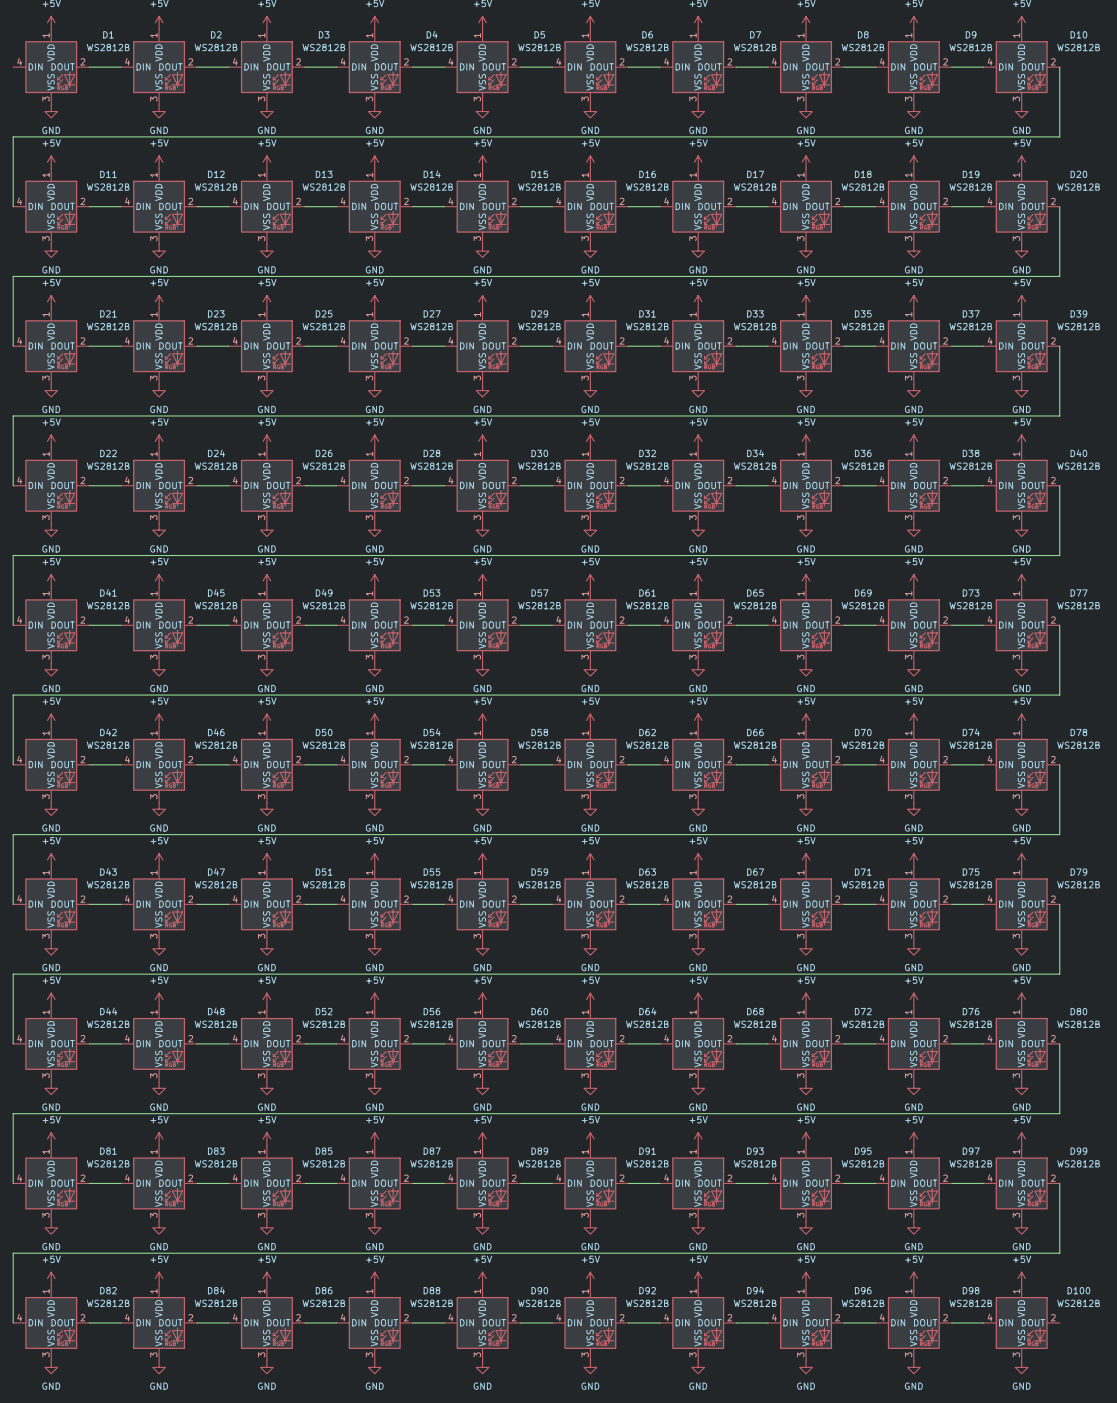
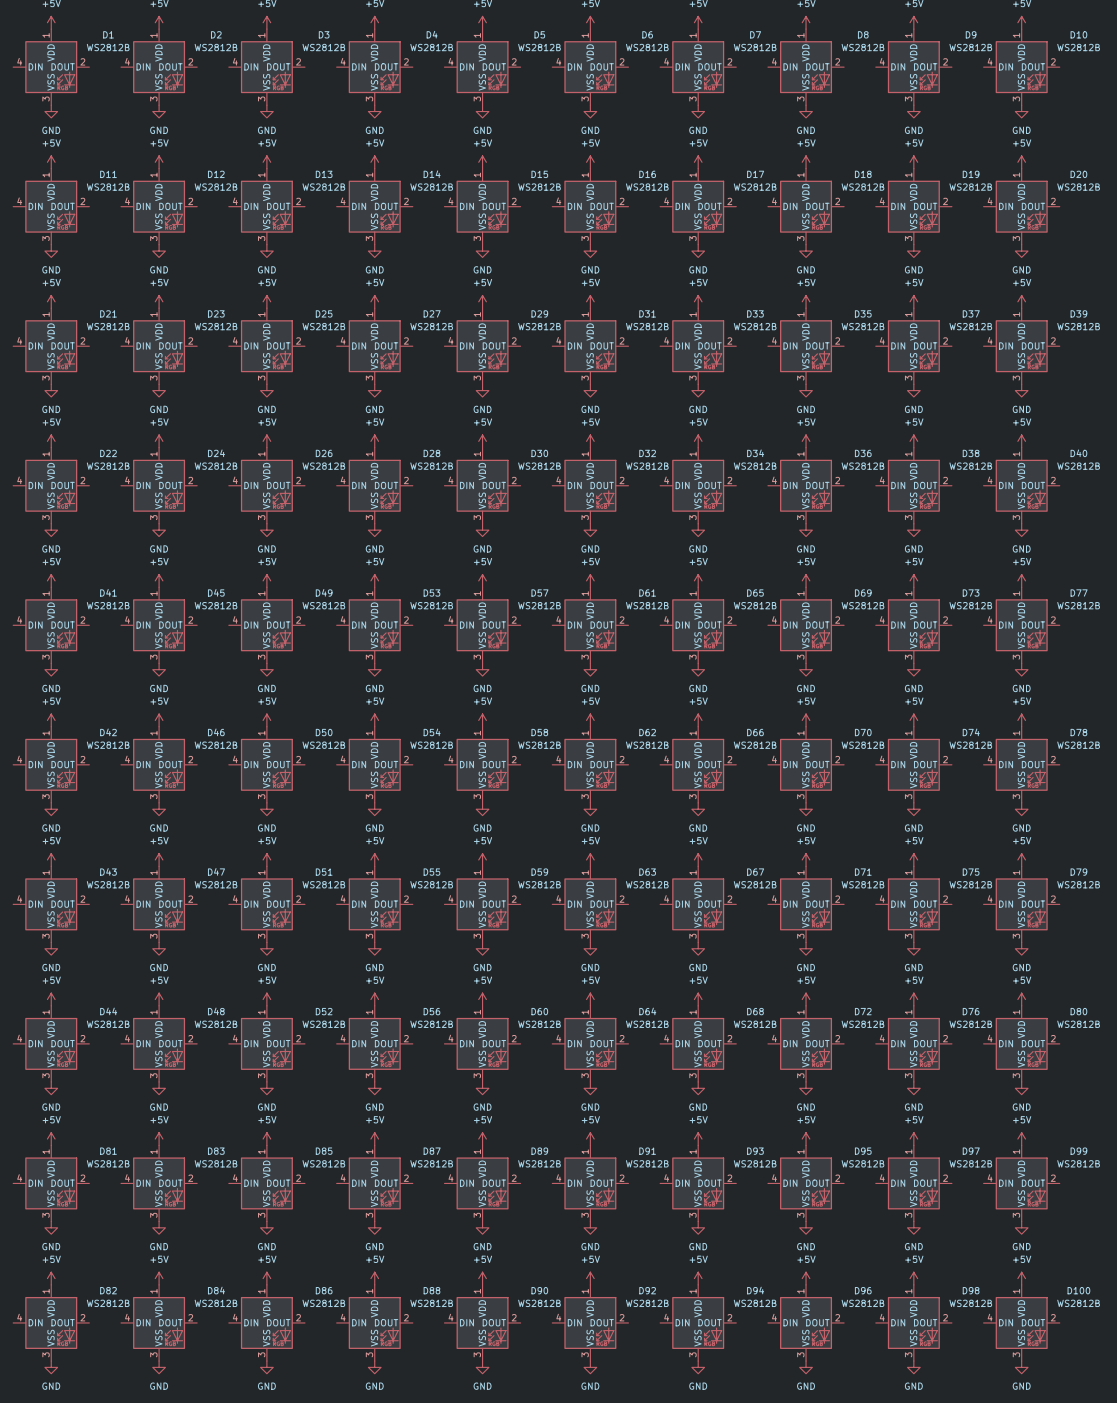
wire: (89, 67) (121, 67) -> none
wire: (197, 67) (228, 67) -> none
wire: (304, 67) (336, 67) -> none
wire: (412, 67) (444, 67) -> none
wire: (520, 67) (552, 67) -> none
wire: (628, 67) (660, 67) -> none
wire: (736, 67) (767, 67) -> none
wire: (844, 67) (875, 67) -> none
wire: (951, 67) (983, 67) -> none
wire: (1059, 67) (1059, 136) (13, 136) (13, 206) -> none
wire: (89, 206) (121, 206) -> none
wire: (197, 206) (228, 206) -> none
wire: (304, 206) (336, 206) -> none
wire: (412, 206) (444, 206) -> none
wire: (520, 206) (552, 206) -> none
wire: (628, 206) (660, 206) -> none
wire: (736, 206) (767, 206) -> none
wire: (844, 206) (875, 206) -> none
wire: (951, 206) (983, 206) -> none
wire: (1059, 206) (1059, 276) (13, 276) (13, 346) -> none
wire: (89, 346) (121, 346) -> none
wire: (197, 346) (228, 346) -> none
wire: (304, 346) (336, 346) -> none
wire: (412, 346) (444, 346) -> none
wire: (520, 346) (552, 346) -> none
wire: (628, 346) (660, 346) -> none
wire: (736, 346) (767, 346) -> none
wire: (844, 346) (875, 346) -> none
wire: (951, 346) (983, 346) -> none
wire: (1059, 346) (1059, 415) (13, 415) (13, 485) -> none
wire: (89, 485) (121, 485) -> none
wire: (197, 485) (228, 485) -> none
wire: (304, 485) (336, 485) -> none
wire: (412, 485) (444, 485) -> none
wire: (520, 485) (552, 485) -> none
wire: (628, 485) (660, 485) -> none
wire: (736, 485) (767, 485) -> none
wire: (844, 485) (875, 485) -> none
wire: (951, 485) (983, 485) -> none
wire: (1059, 485) (1059, 555) (13, 555) (13, 625) -> none
wire: (89, 625) (121, 625) -> none
wire: (197, 625) (228, 625) -> none
wire: (304, 625) (336, 625) -> none
wire: (412, 625) (444, 625) -> none
wire: (520, 625) (552, 625) -> none
wire: (628, 625) (660, 625) -> none
wire: (736, 625) (767, 625) -> none
wire: (844, 625) (875, 625) -> none
wire: (951, 625) (983, 625) -> none
wire: (1059, 625) (1059, 695) (13, 695) (13, 764) -> none
wire: (89, 764) (121, 764) -> none
wire: (197, 764) (228, 764) -> none
wire: (304, 764) (336, 764) -> none
wire: (412, 764) (444, 764) -> none
wire: (520, 764) (552, 764) -> none
wire: (628, 764) (660, 764) -> none
wire: (736, 764) (767, 764) -> none
wire: (844, 764) (875, 764) -> none
wire: (951, 764) (983, 764) -> none
wire: (1059, 764) (1059, 834) (13, 834) (13, 904) -> none
wire: (89, 904) (121, 904) -> none
wire: (197, 904) (228, 904) -> none
wire: (304, 904) (336, 904) -> none
wire: (412, 904) (444, 904) -> none
wire: (520, 904) (552, 904) -> none
wire: (628, 904) (660, 904) -> none
wire: (736, 904) (767, 904) -> none
wire: (844, 904) (875, 904) -> none
wire: (951, 904) (983, 904) -> none
wire: (1059, 904) (1059, 974) (13, 974) (13, 1043) -> none
wire: (89, 1043) (121, 1043) -> none
wire: (197, 1043) (228, 1043) -> none
wire: (304, 1043) (336, 1043) -> none
wire: (412, 1043) (444, 1043) -> none
wire: (520, 1043) (552, 1043) -> none
wire: (628, 1043) (660, 1043) -> none
wire: (736, 1043) (767, 1043) -> none
wire: (844, 1043) (875, 1043) -> none
wire: (951, 1043) (983, 1043) -> none
wire: (1059, 1043) (1059, 1113) (13, 1113) (13, 1183) -> none
wire: (89, 1183) (121, 1183) -> none
wire: (197, 1183) (228, 1183) -> none
wire: (304, 1183) (336, 1183) -> none
wire: (412, 1183) (444, 1183) -> none
wire: (520, 1183) (552, 1183) -> none
wire: (628, 1183) (660, 1183) -> none
wire: (736, 1183) (767, 1183) -> none
wire: (844, 1183) (875, 1183) -> none
wire: (951, 1183) (983, 1183) -> none
wire: (1059, 1183) (1059, 1253) (13, 1253) (13, 1322) -> none
wire: (89, 1322) (121, 1322) -> none
wire: (197, 1322) (228, 1322) -> none
wire: (304, 1322) (336, 1322) -> none
wire: (412, 1322) (444, 1322) -> none
wire: (520, 1322) (552, 1322) -> none
wire: (628, 1322) (660, 1322) -> none
wire: (736, 1322) (767, 1322) -> none
wire: (844, 1322) (875, 1322) -> none
wire: (951, 1322) (983, 1322) -> none

